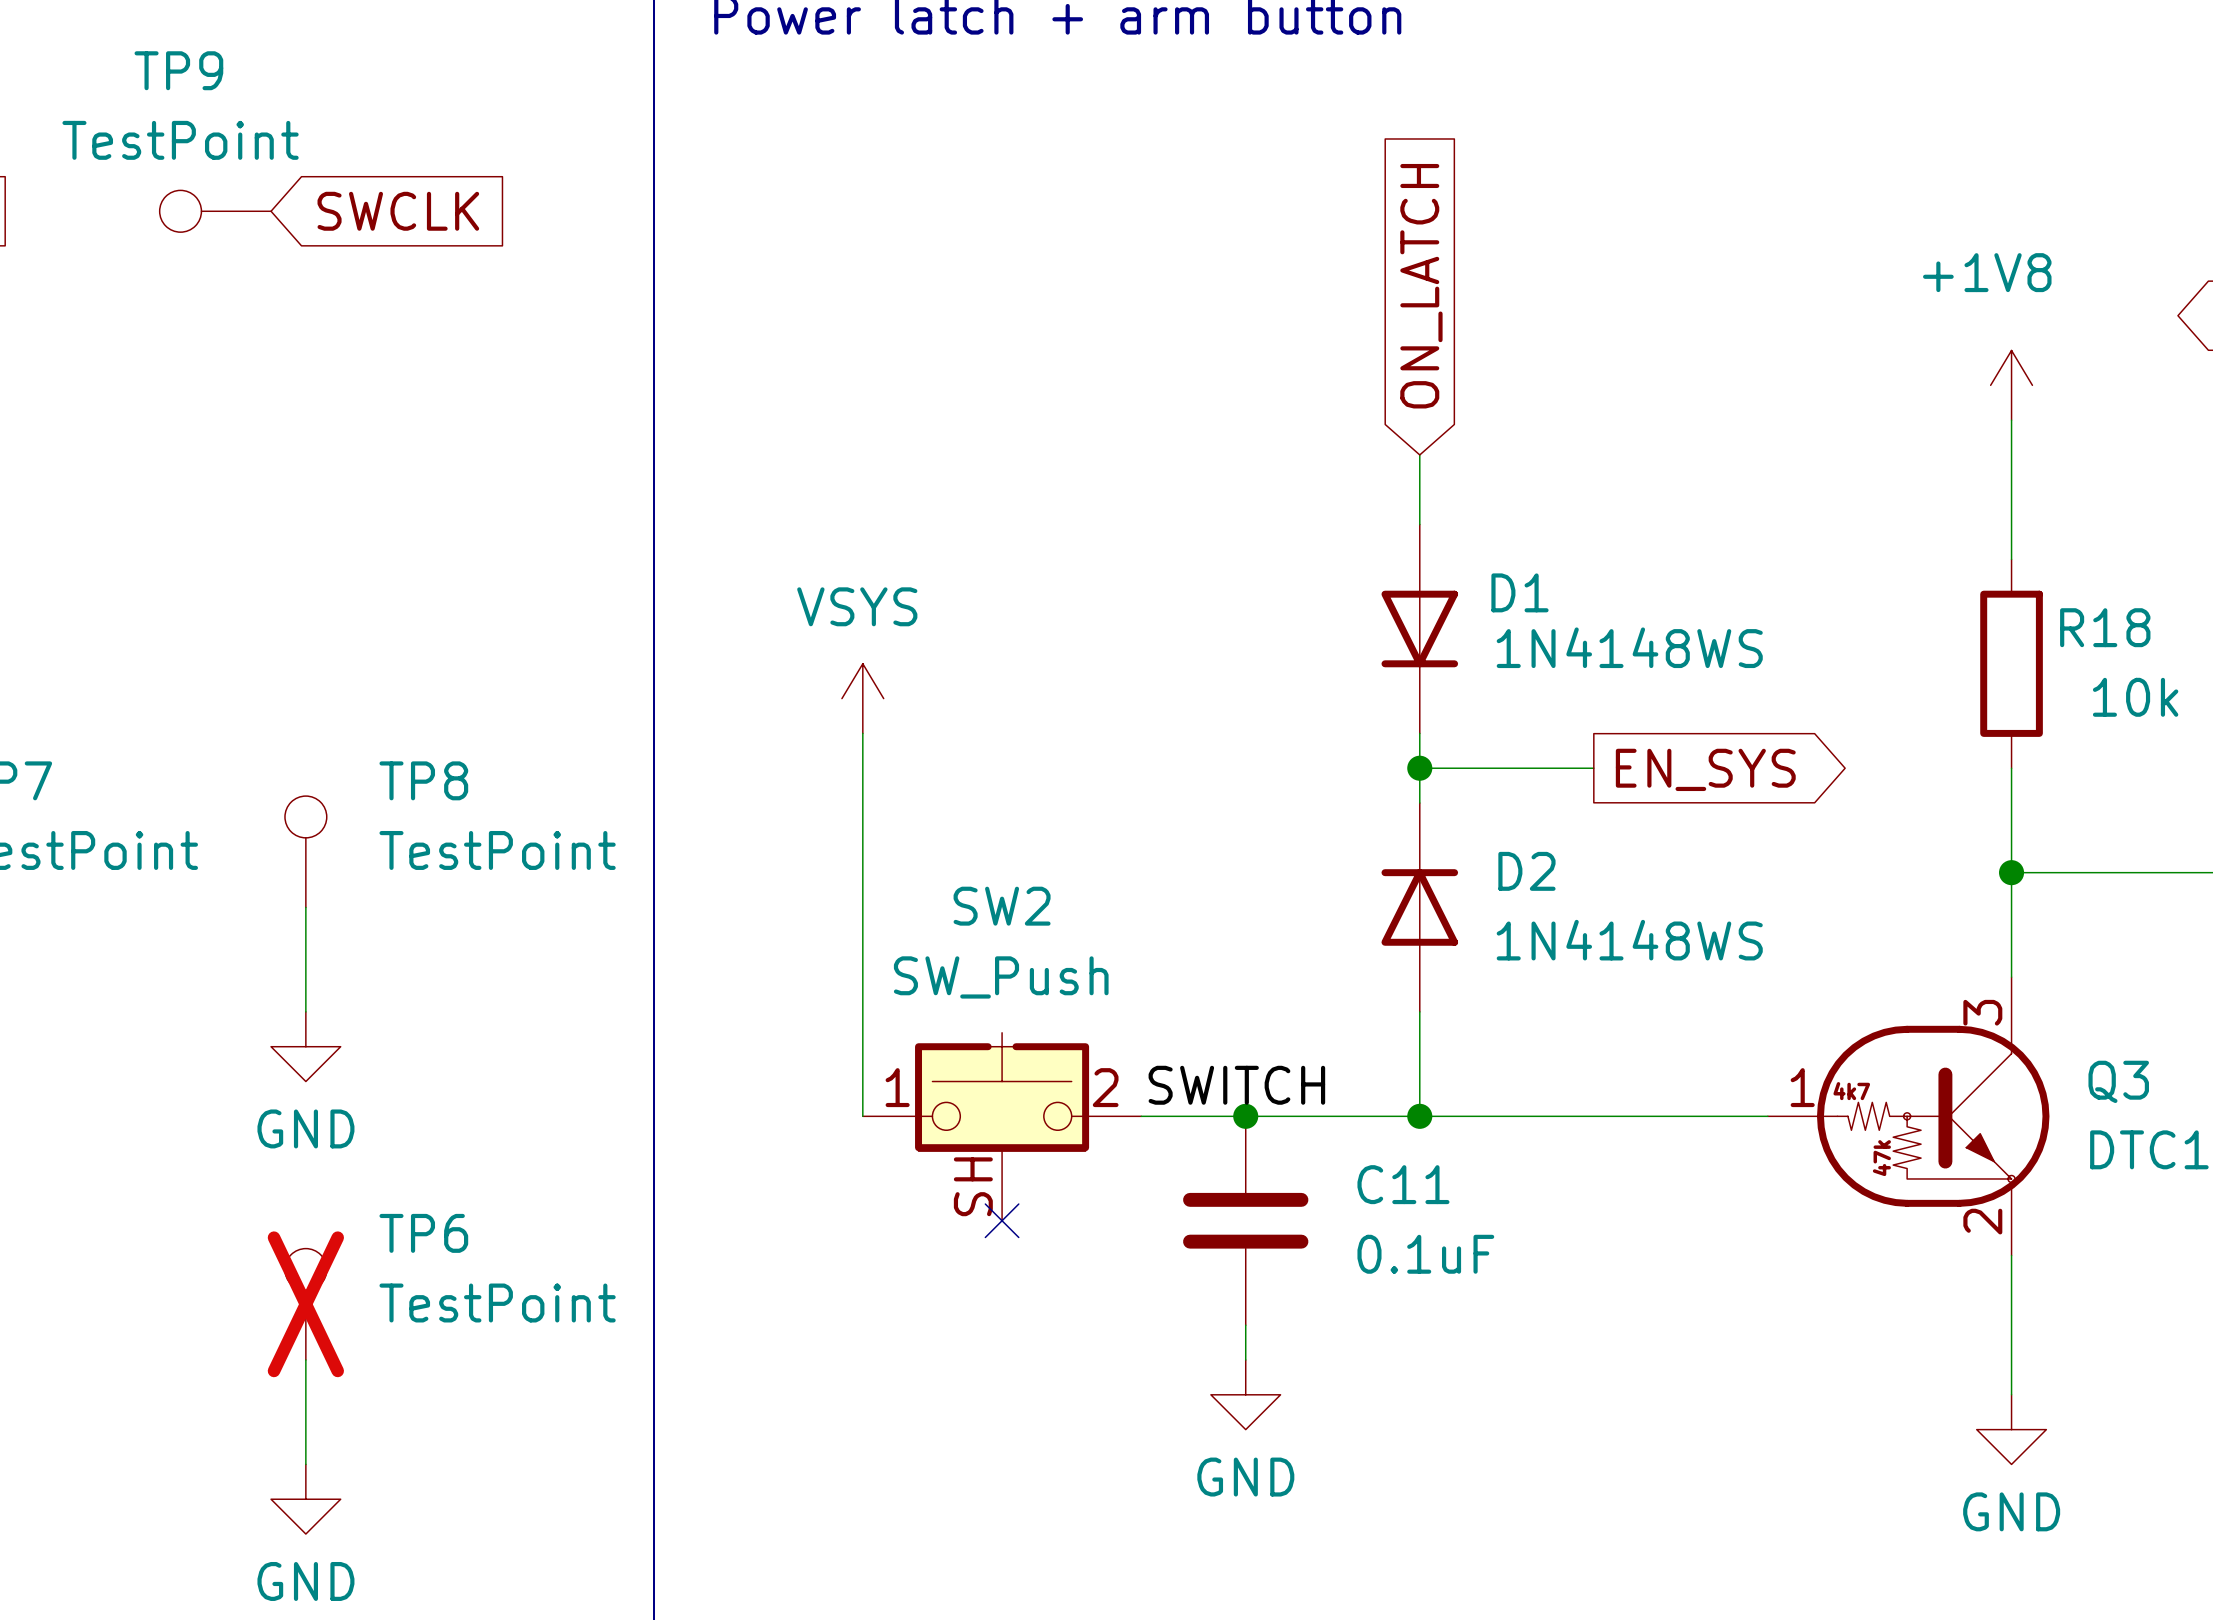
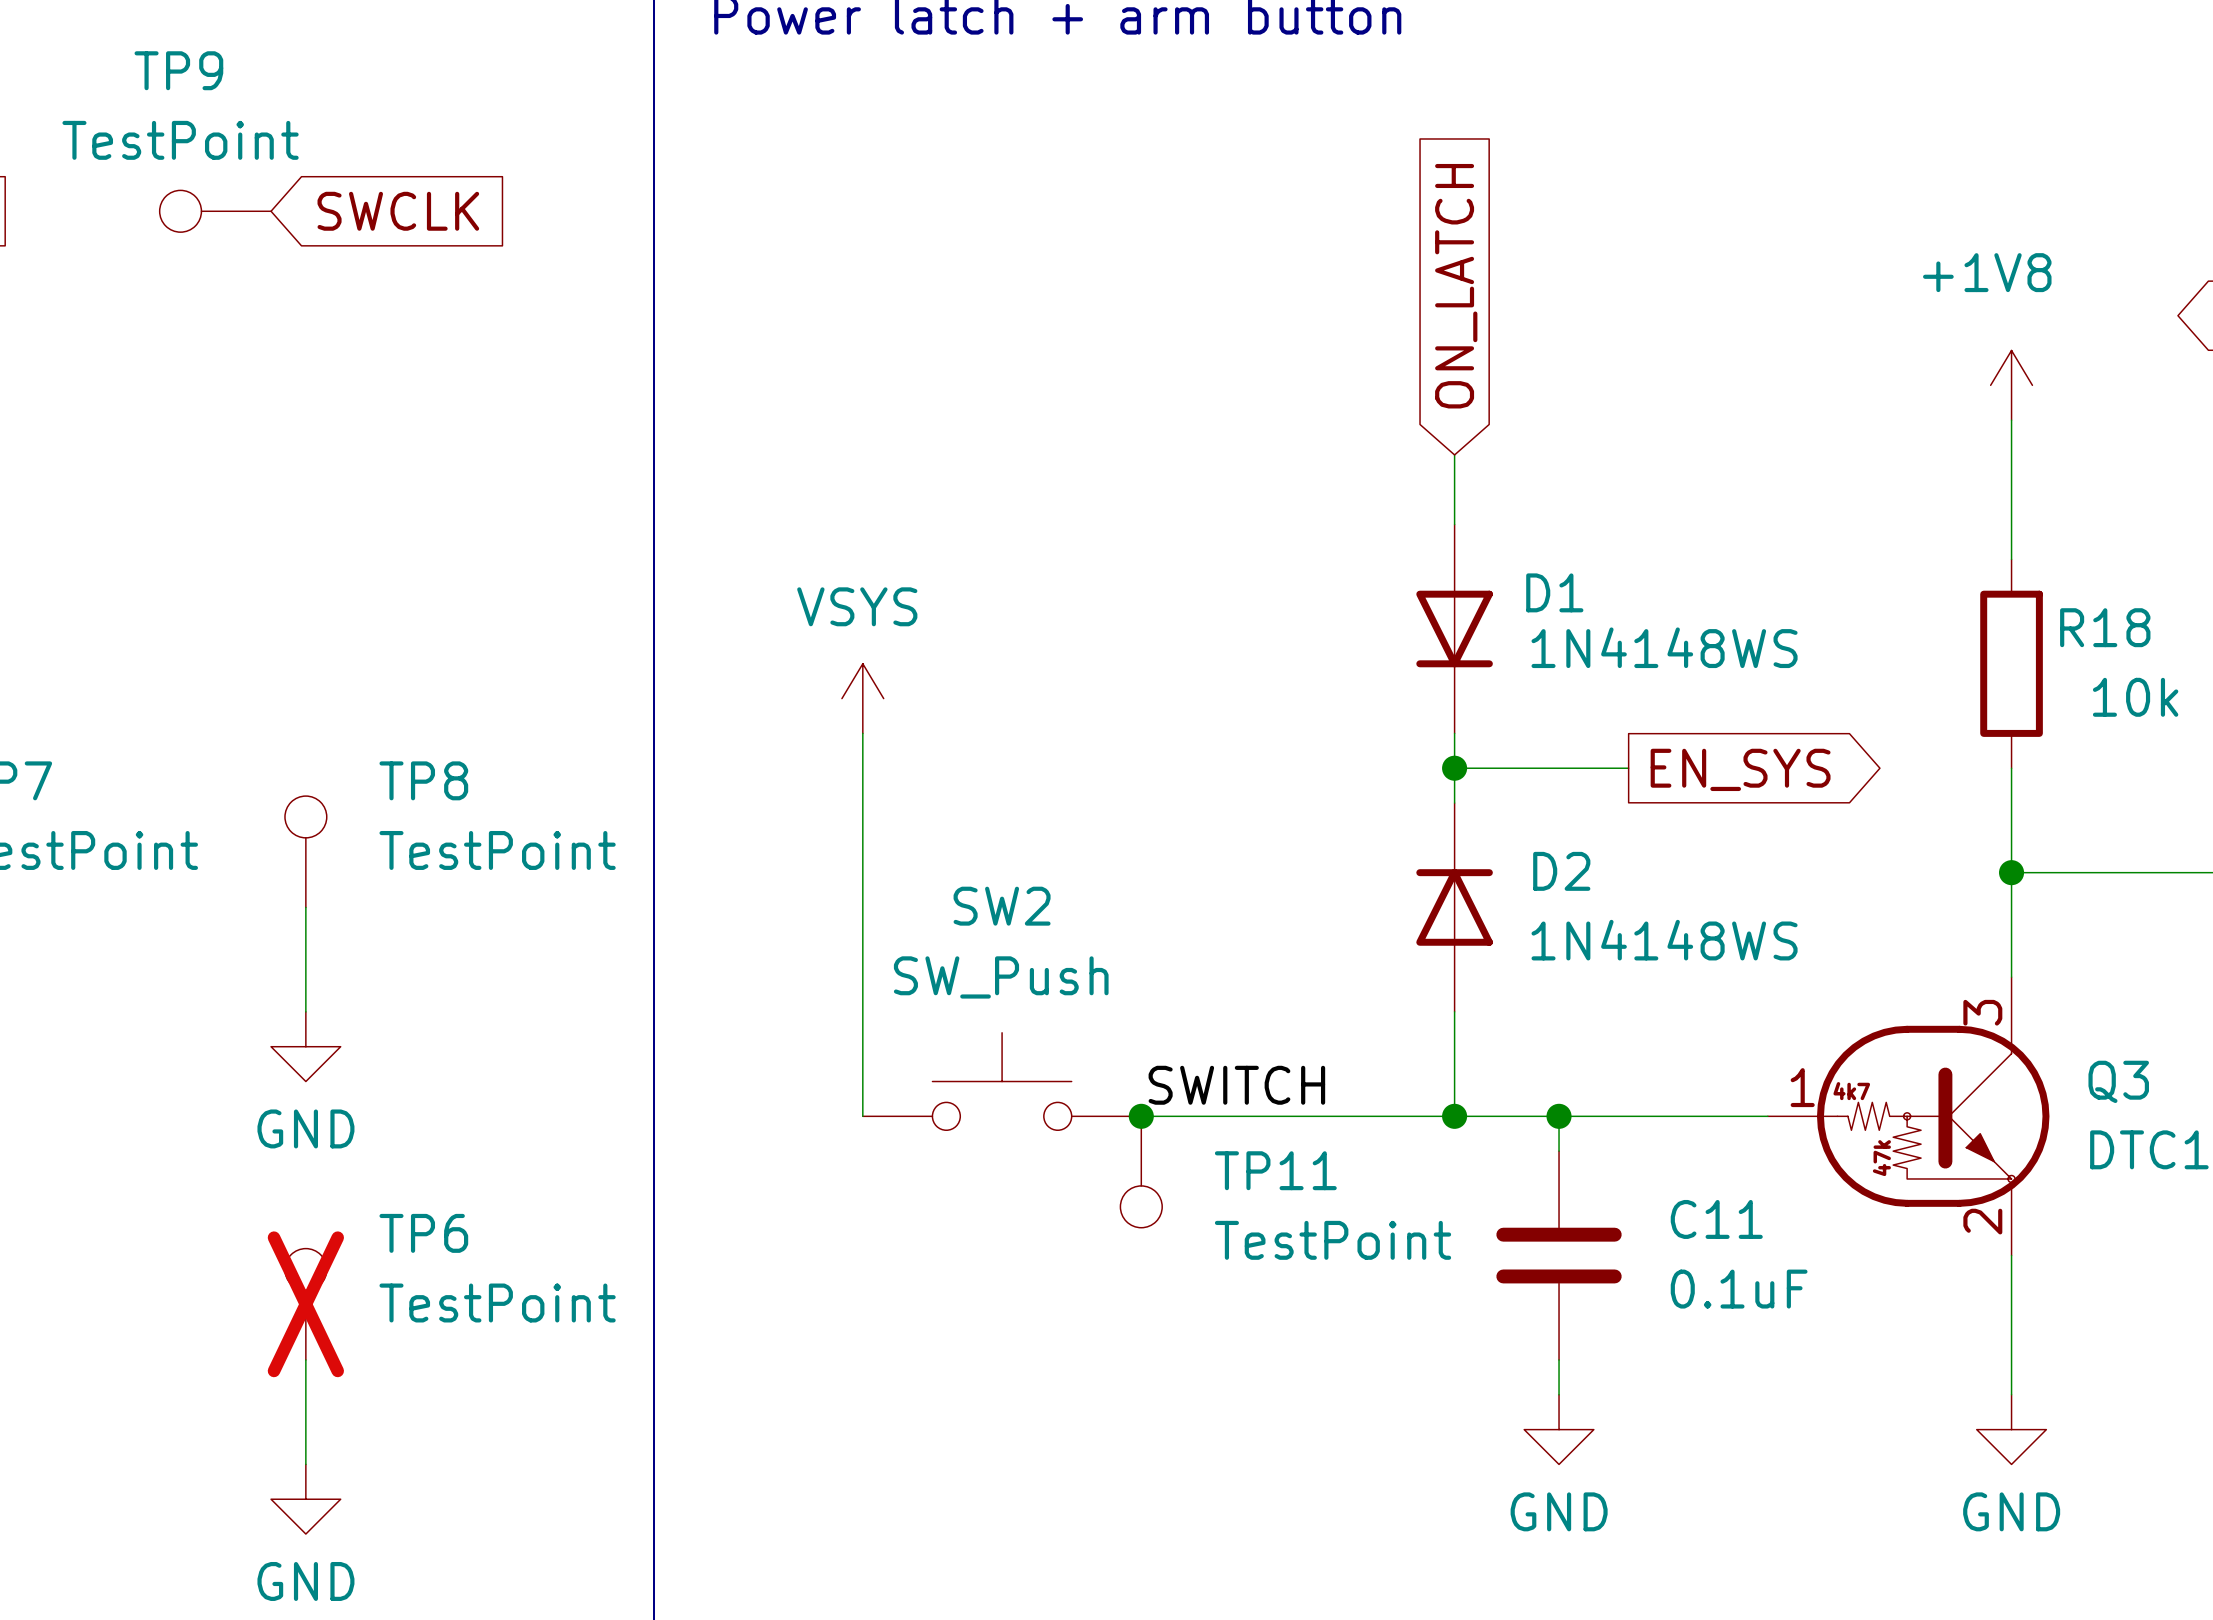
global label position: ON_LATCH (1421, 286) -> ON_LATCH (1456, 286)
wire: (1419, 454) (1419, 524) -> (1454, 454) (1454, 524)
D1 position: (1419, 628) -> (1454, 628)
wire: (1419, 733) (1419, 803) -> (1454, 733) (1454, 803)
wire: (1419, 768) (1454, 768) -> (1593, 768) (1628, 768)
junction position: (1419, 768) -> (1454, 768)
global label position: EN_SYS (1705, 769) -> EN_SYS (1740, 769)
D2 position: (1419, 907) -> (1454, 907)
wire: (1419, 1011) (1419, 1116) -> (1454, 1011) (1454, 1116)
SW2 symbol: [862, 1032, 1142, 1221] -> [862, 1032, 1142, 1131]
junction: none -> (1141, 1116)
junction: (1245, 1116) -> none
junction position: (1419, 1116) -> (1454, 1116)
wire: none -> (1559, 1116) (1559, 1151)
junction: none -> (1559, 1116)
TP11: none -> TestPoint (1141, 1172)
no-connect mark: (1002, 1220) -> none
C11 position: (1245, 1220) -> (1559, 1255)
wire: (1245, 1325) (1245, 1359) -> (1559, 1359) (1559, 1394)
power symbol position: GND (1245, 1394) -> GND (1559, 1429)

